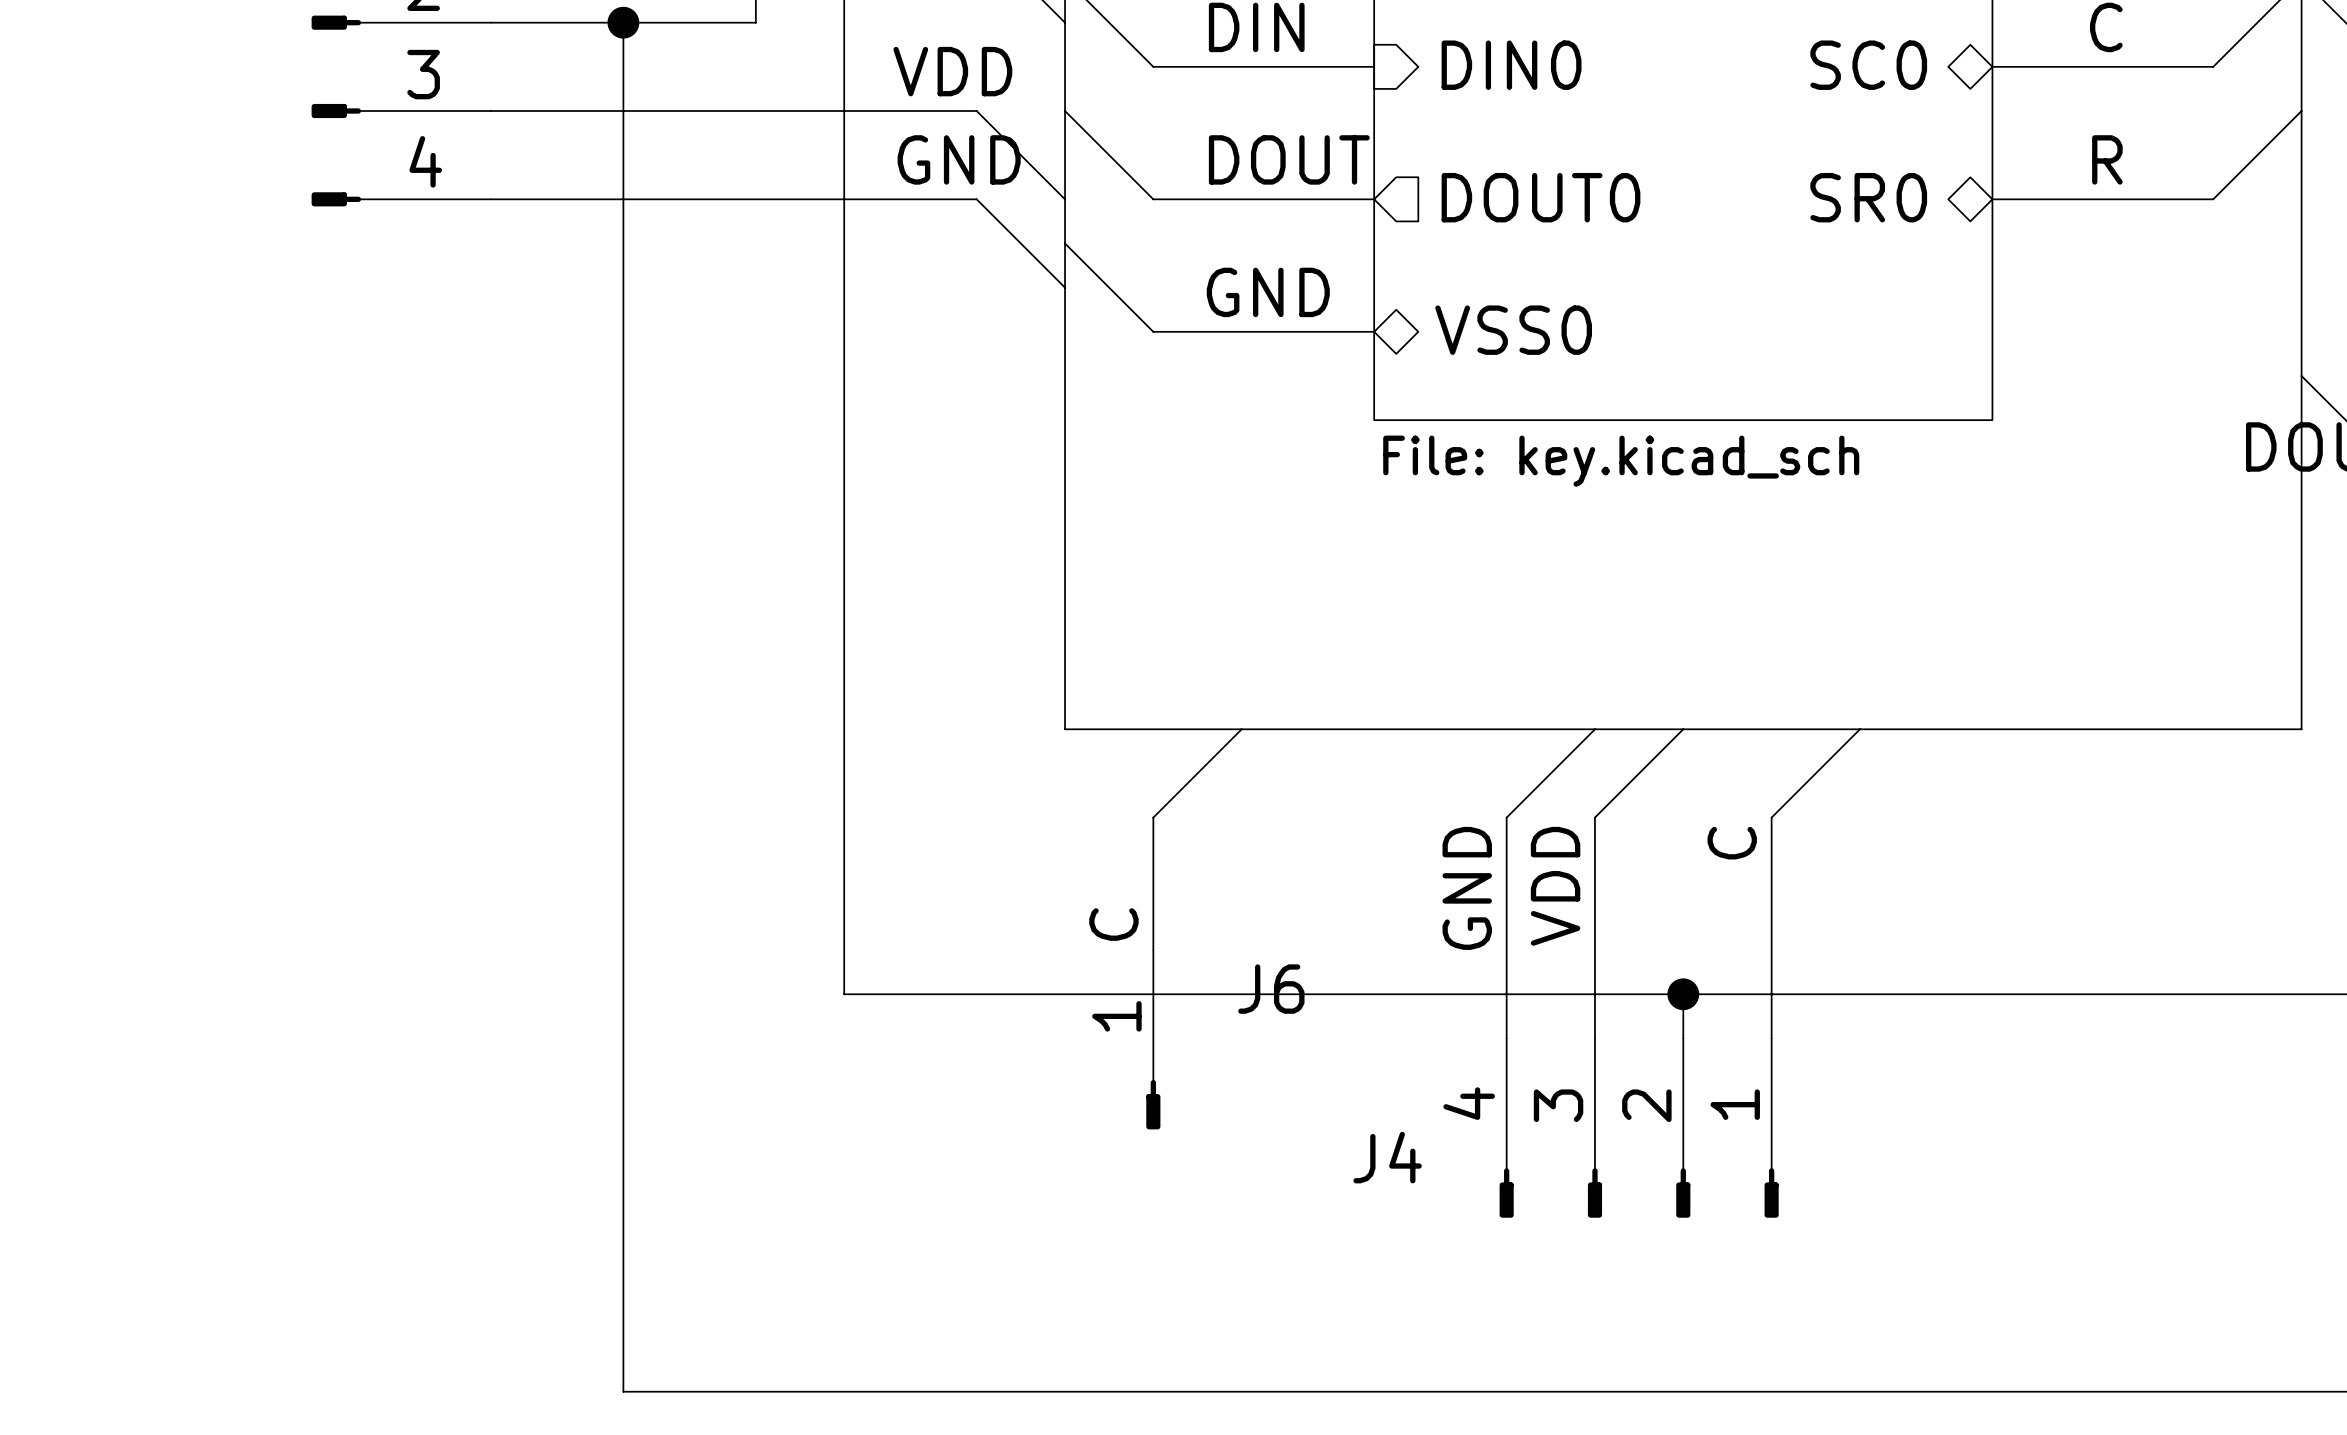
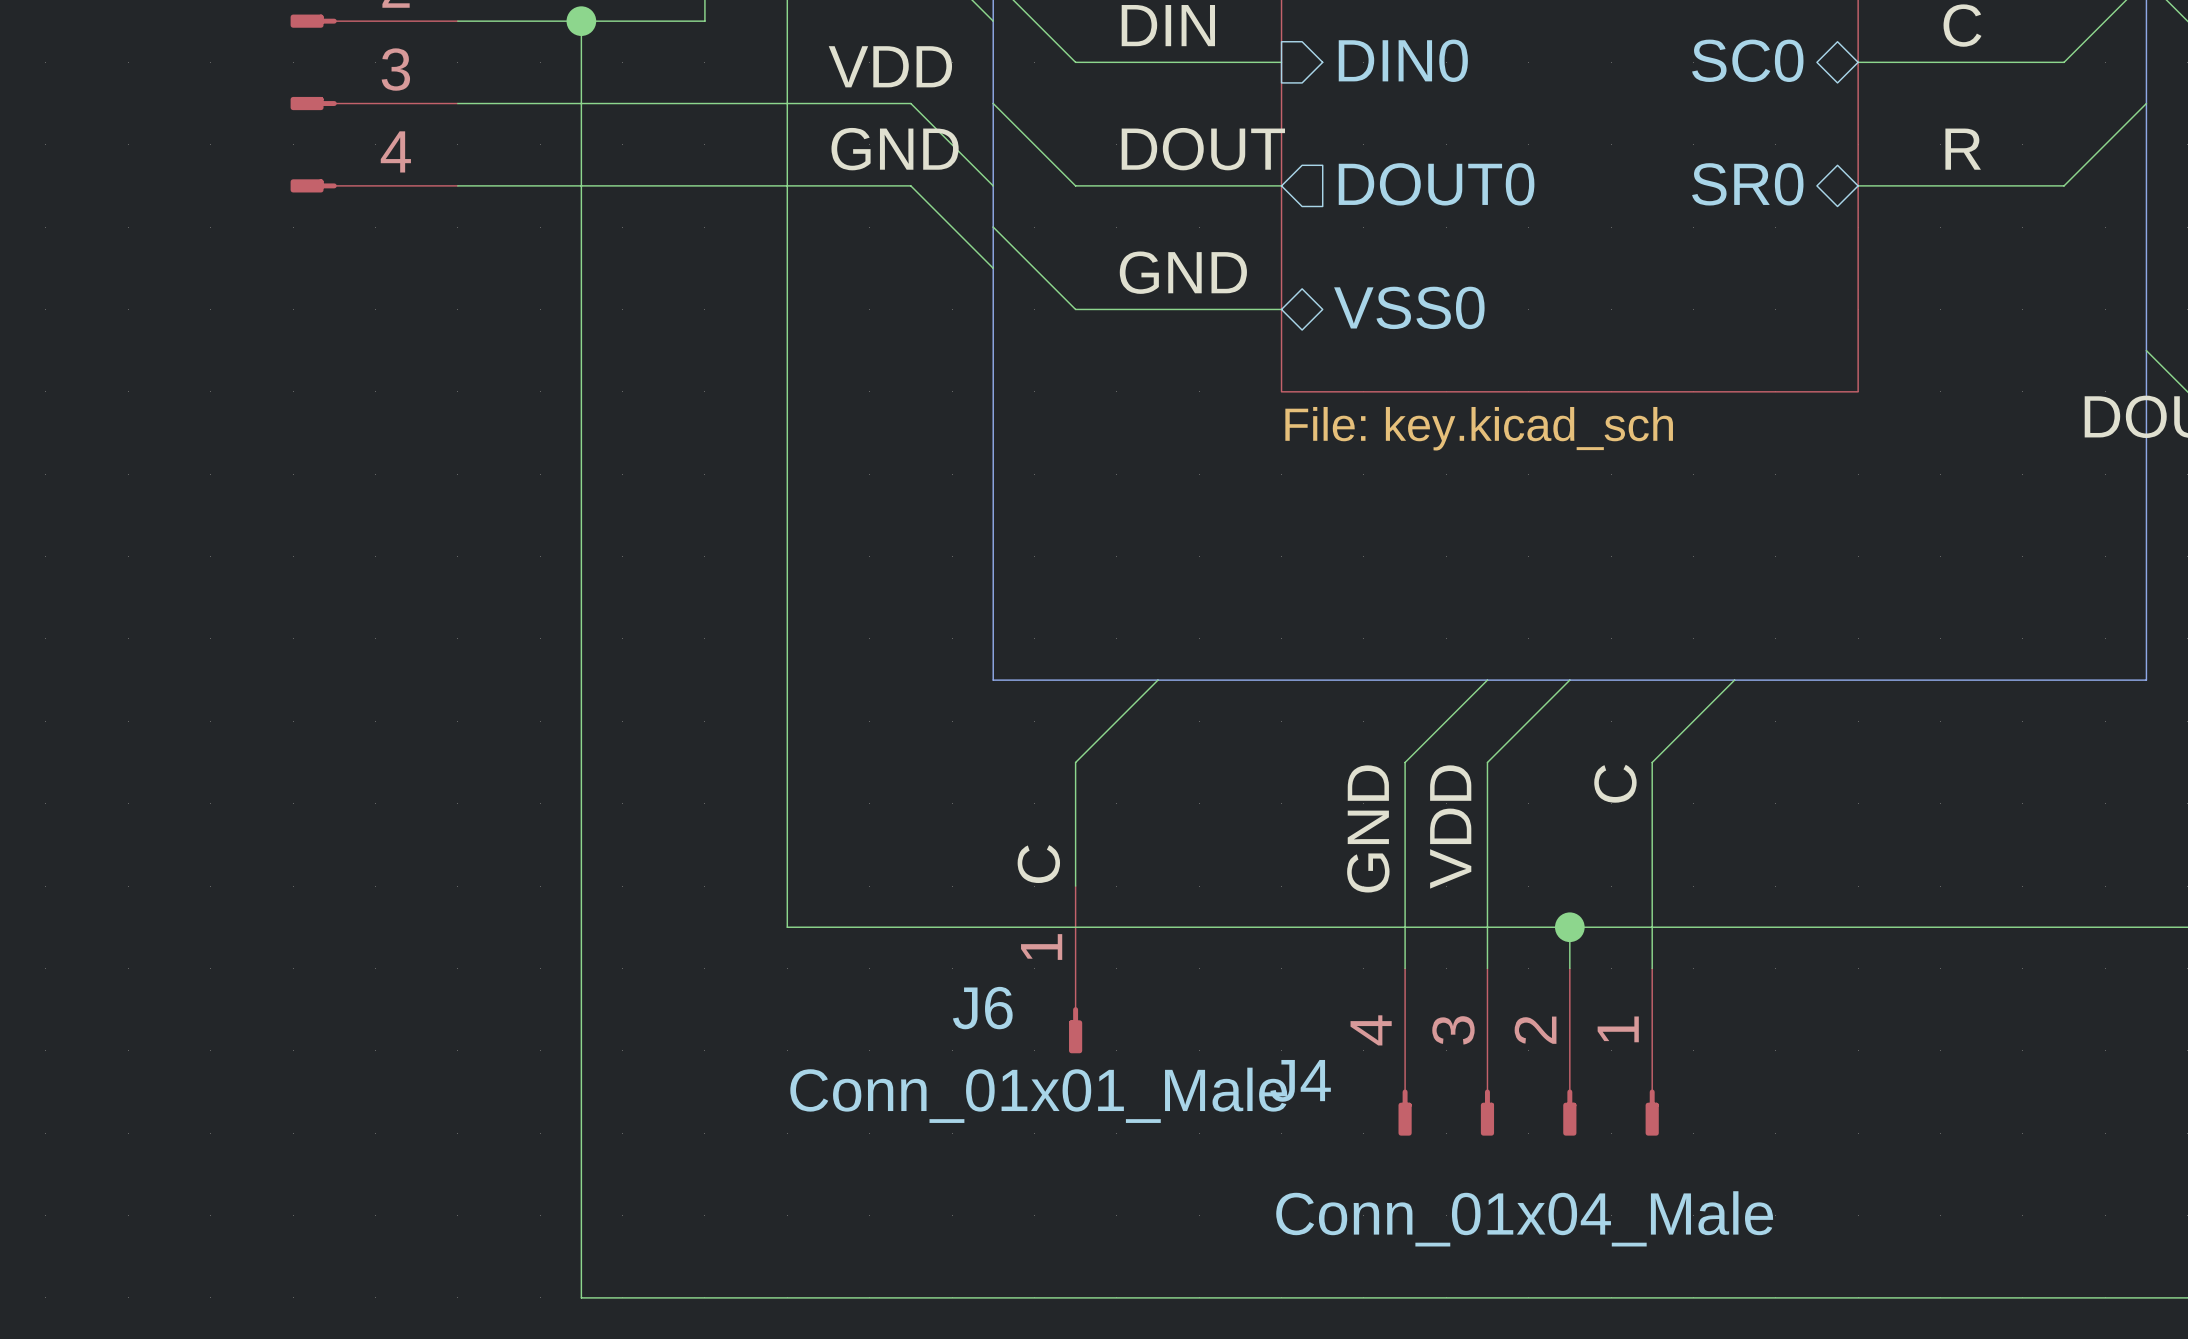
J6 name position: J6 (1271, 989) -> J6 (982, 1008)
J6 value: none -> Conn_01x01_Male (1038, 1095)
J4 value: none -> Conn_01x04_Male (1524, 1218)

